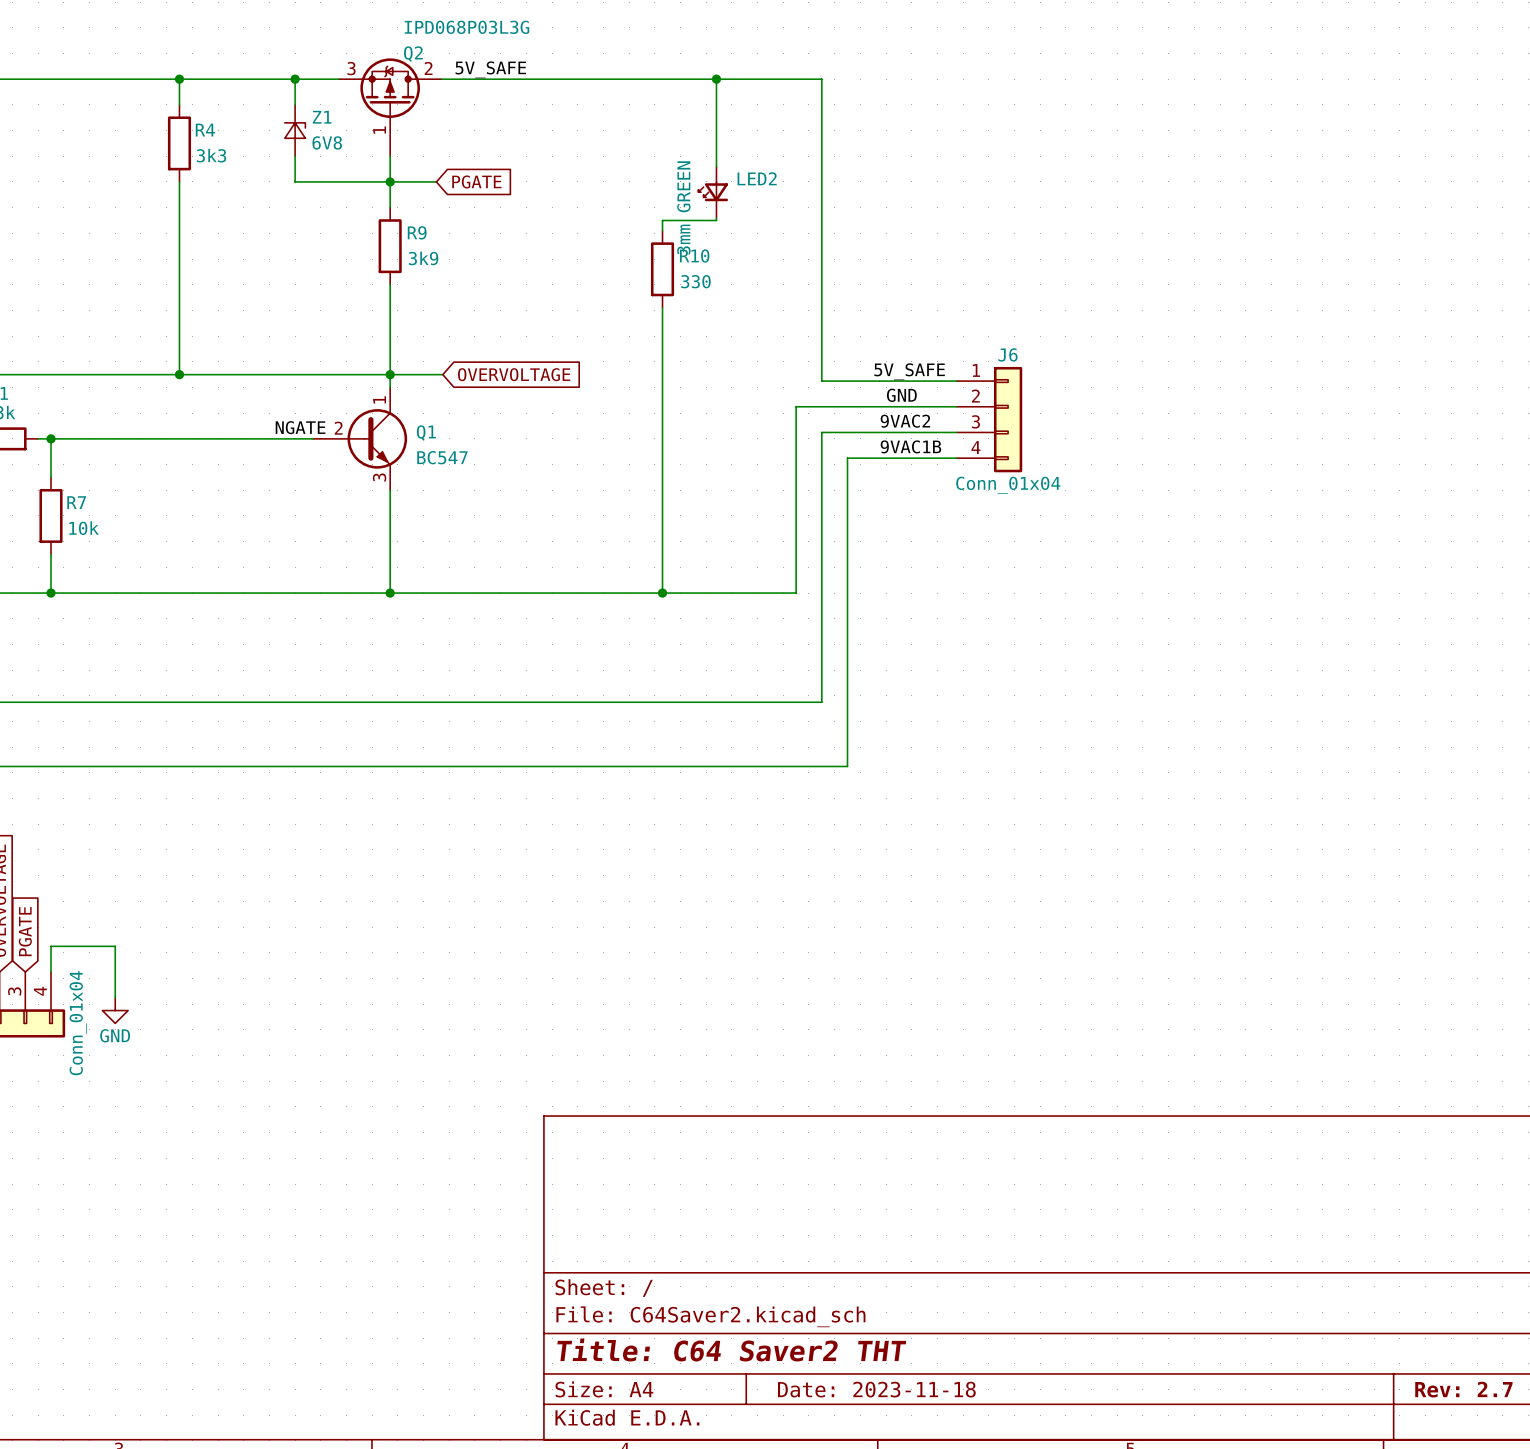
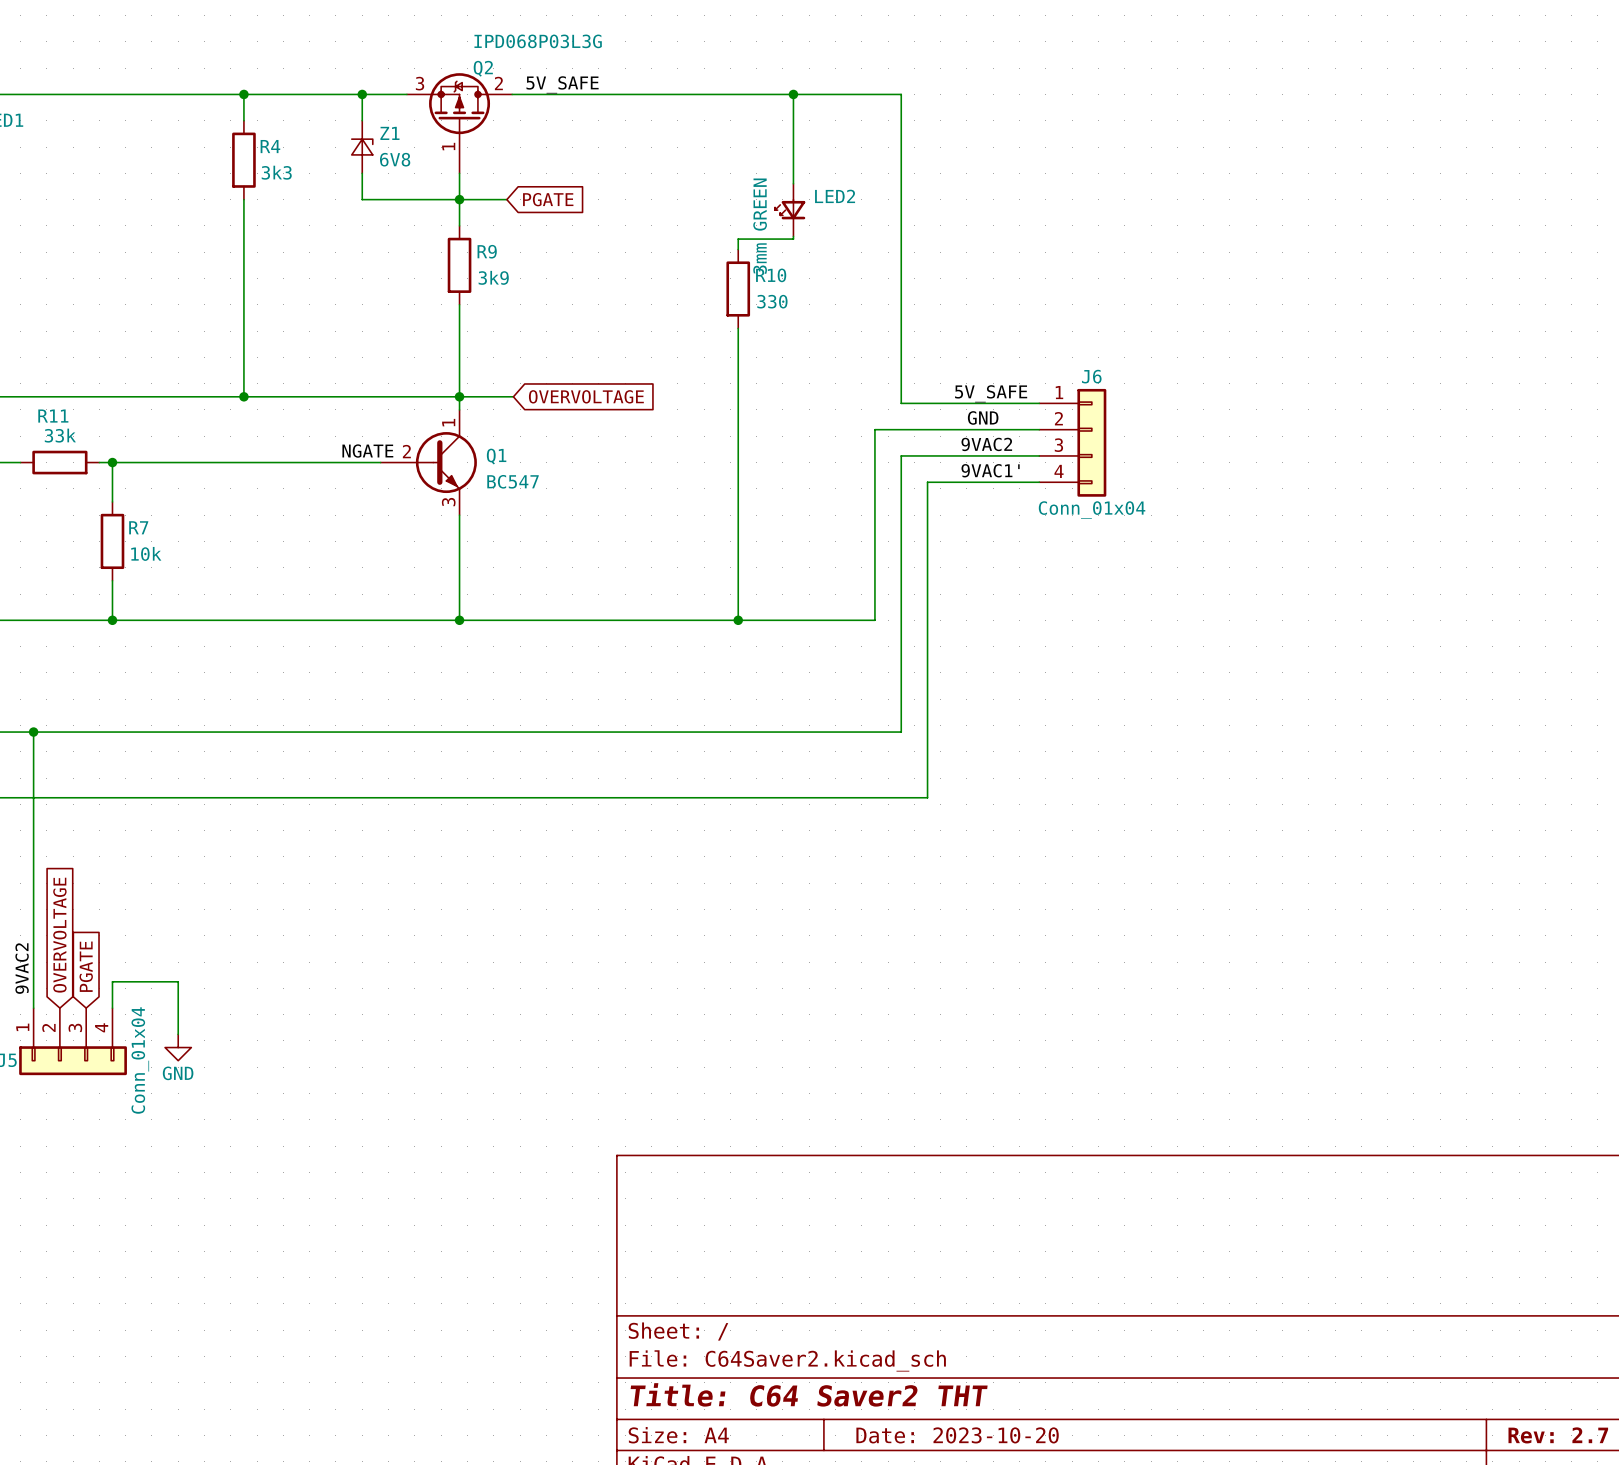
label: 9VAC1B (910, 446) -> 9VAC1' (990, 470)
title block: Date: 2023-11-18 (876, 1389) -> Date: 2023-10-20 (957, 1435)

